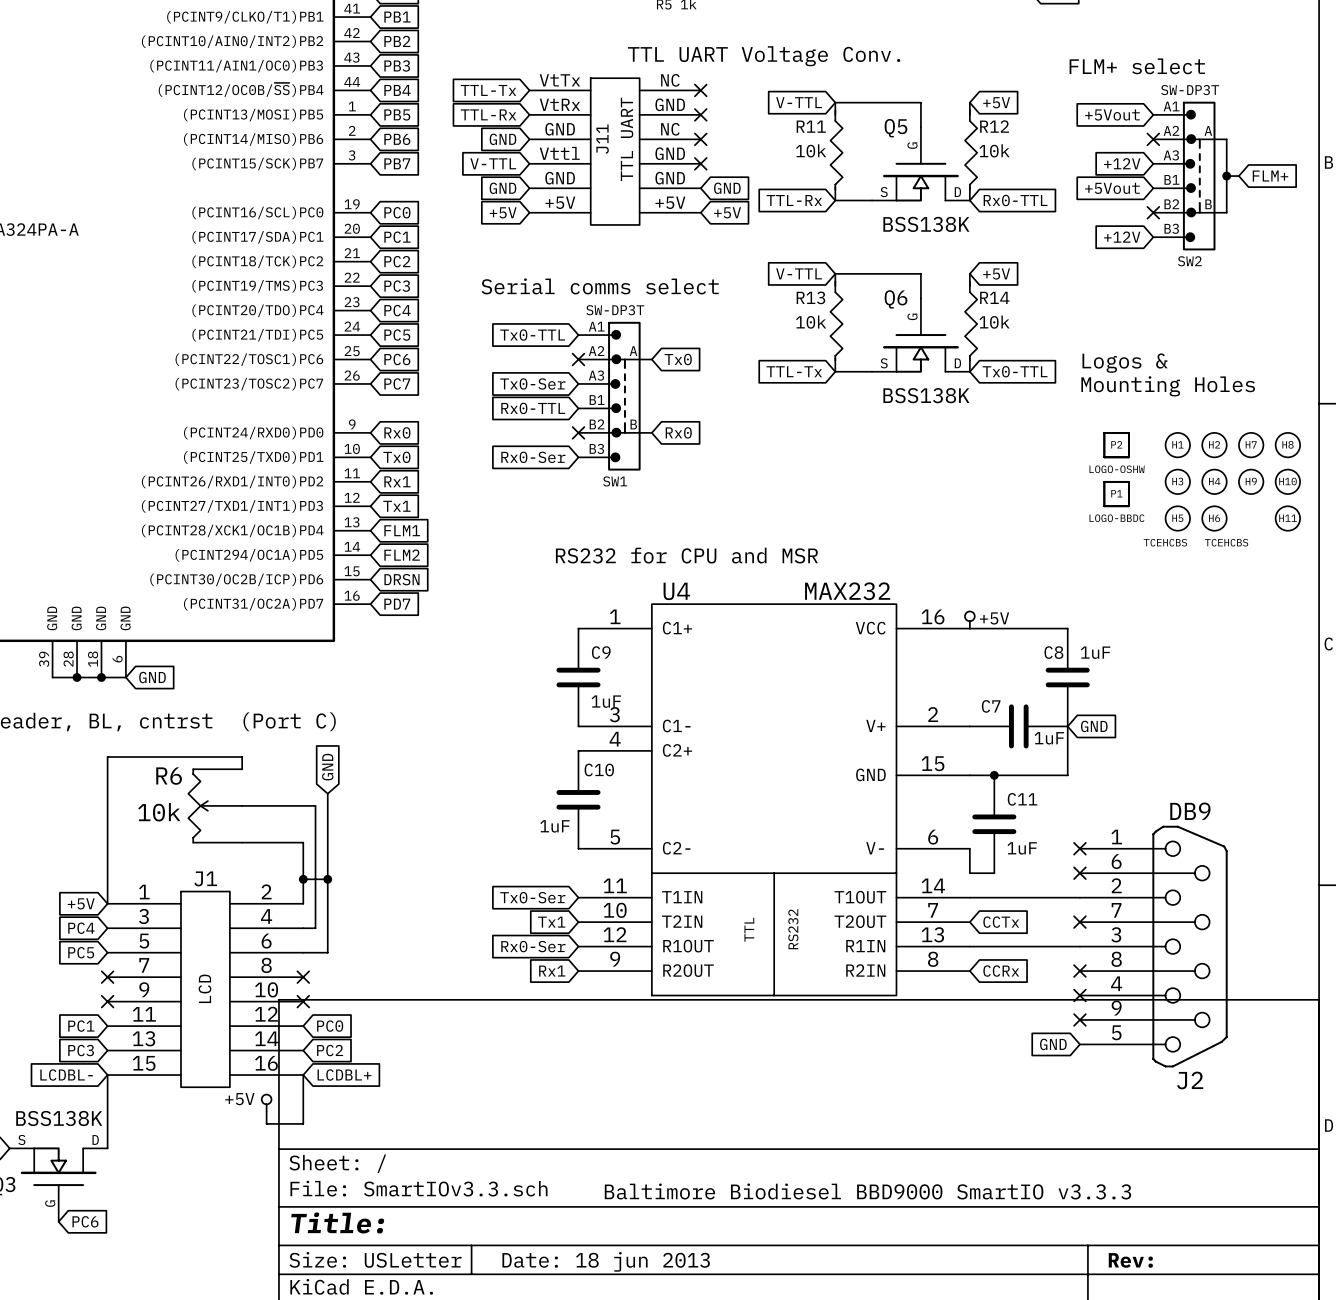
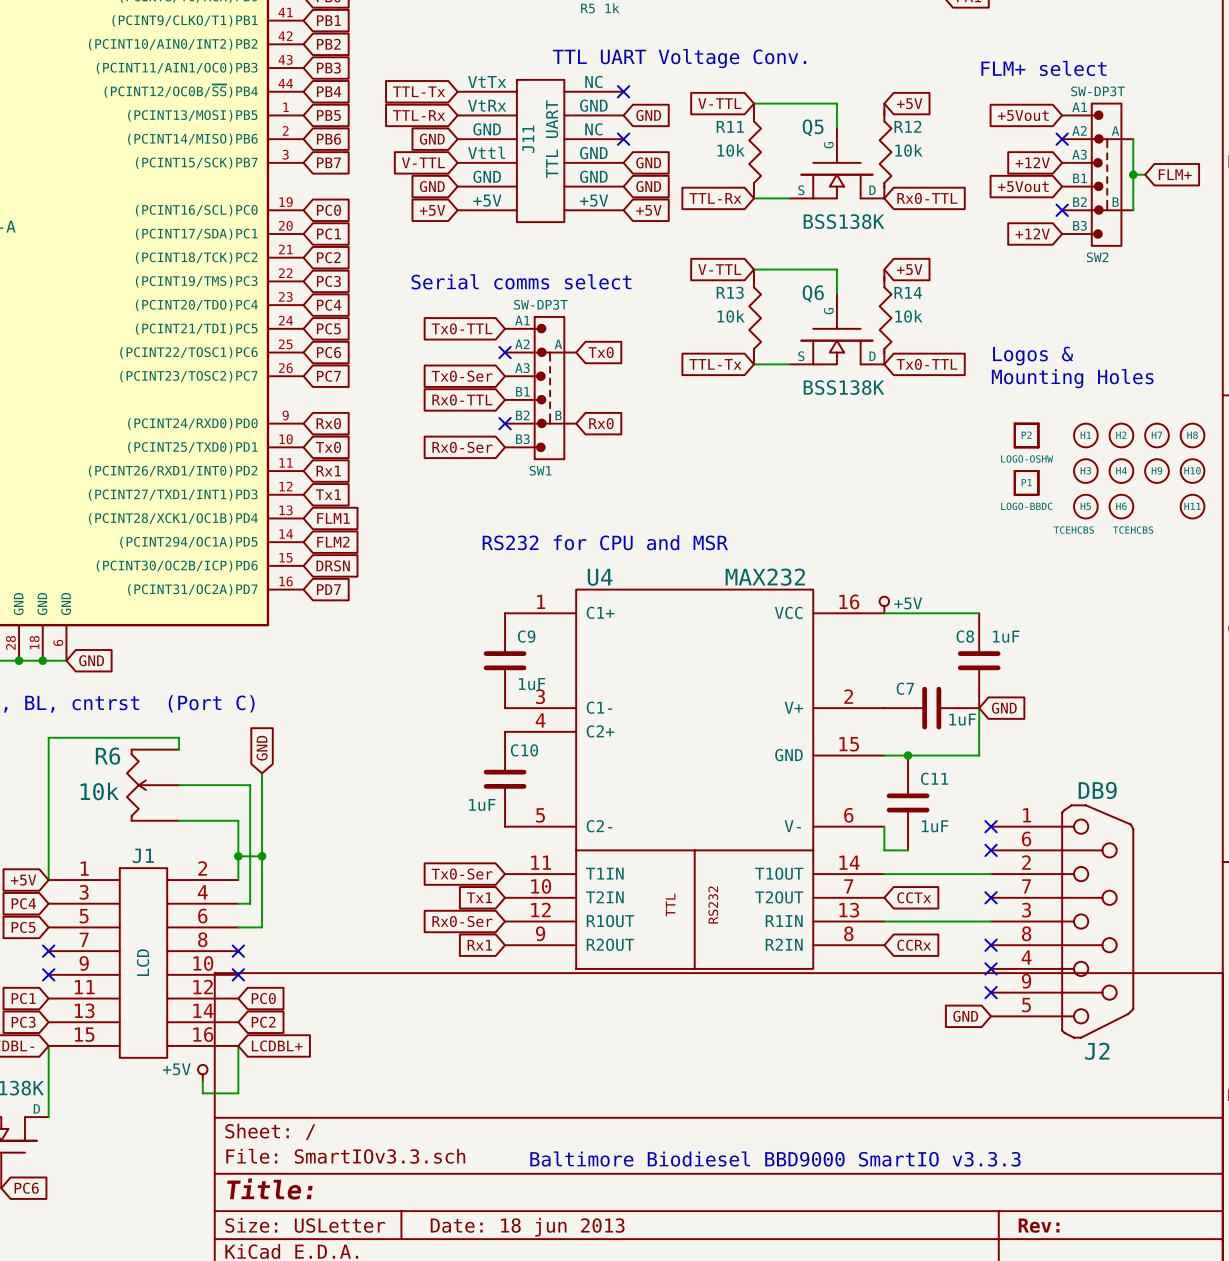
no-connect mark: (700, 114) -> none
global label: none -> GND (648, 115)
no-connect mark: (700, 163) -> none
global label: none -> GND (648, 162)

